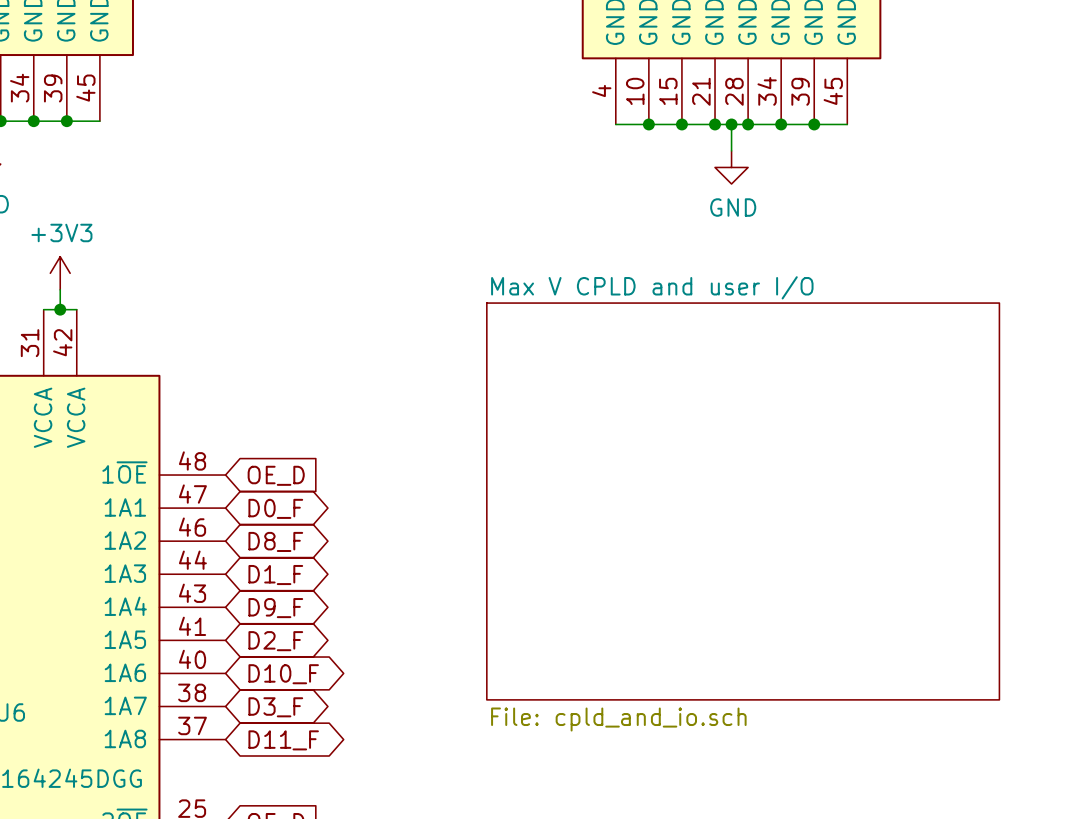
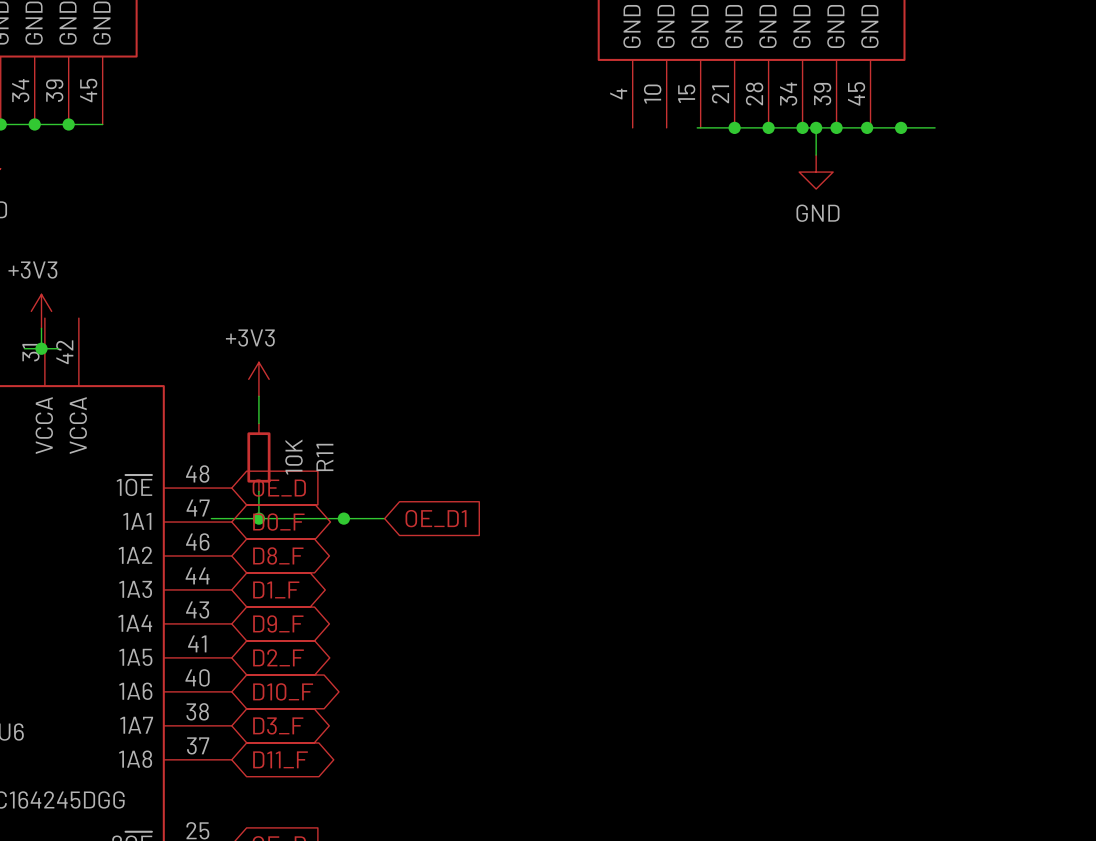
wire: (615, 124) (678, 124) -> (870, 127) (935, 127)
junction: (648, 124) -> none
junction: (681, 124) -> none
wire: (731, 124) (731, 150) -> (816, 127) (816, 155)
junction: (731, 124) -> none
junction: none -> (816, 127)
junction: none -> (867, 127)
junction: none -> (901, 127)
power symbol position: GND (731, 167) -> GND (816, 172)
power symbol position: +3V3 (60, 273) -> +3V3 (41, 311)
wire: (60, 289) (60, 309) -> (41, 328) (41, 348)
wire: (43, 309) (76, 309) -> (24, 348) (58, 348)
junction position: (60, 309) -> (41, 348)
power symbol: none -> +3V3 (258, 379)
wire: none -> (258, 396) (258, 423)
R11: none -> 10K (258, 457)
wire: none -> (258, 491) (258, 518)
sheet Max V CPLD and user I/O: File: cpld_and_io.sch (743, 501) -> none
wire: none -> (211, 518) (384, 518)
junction: none -> (258, 518)
junction: none -> (343, 518)
global label: none -> OE_D1 (436, 518)

